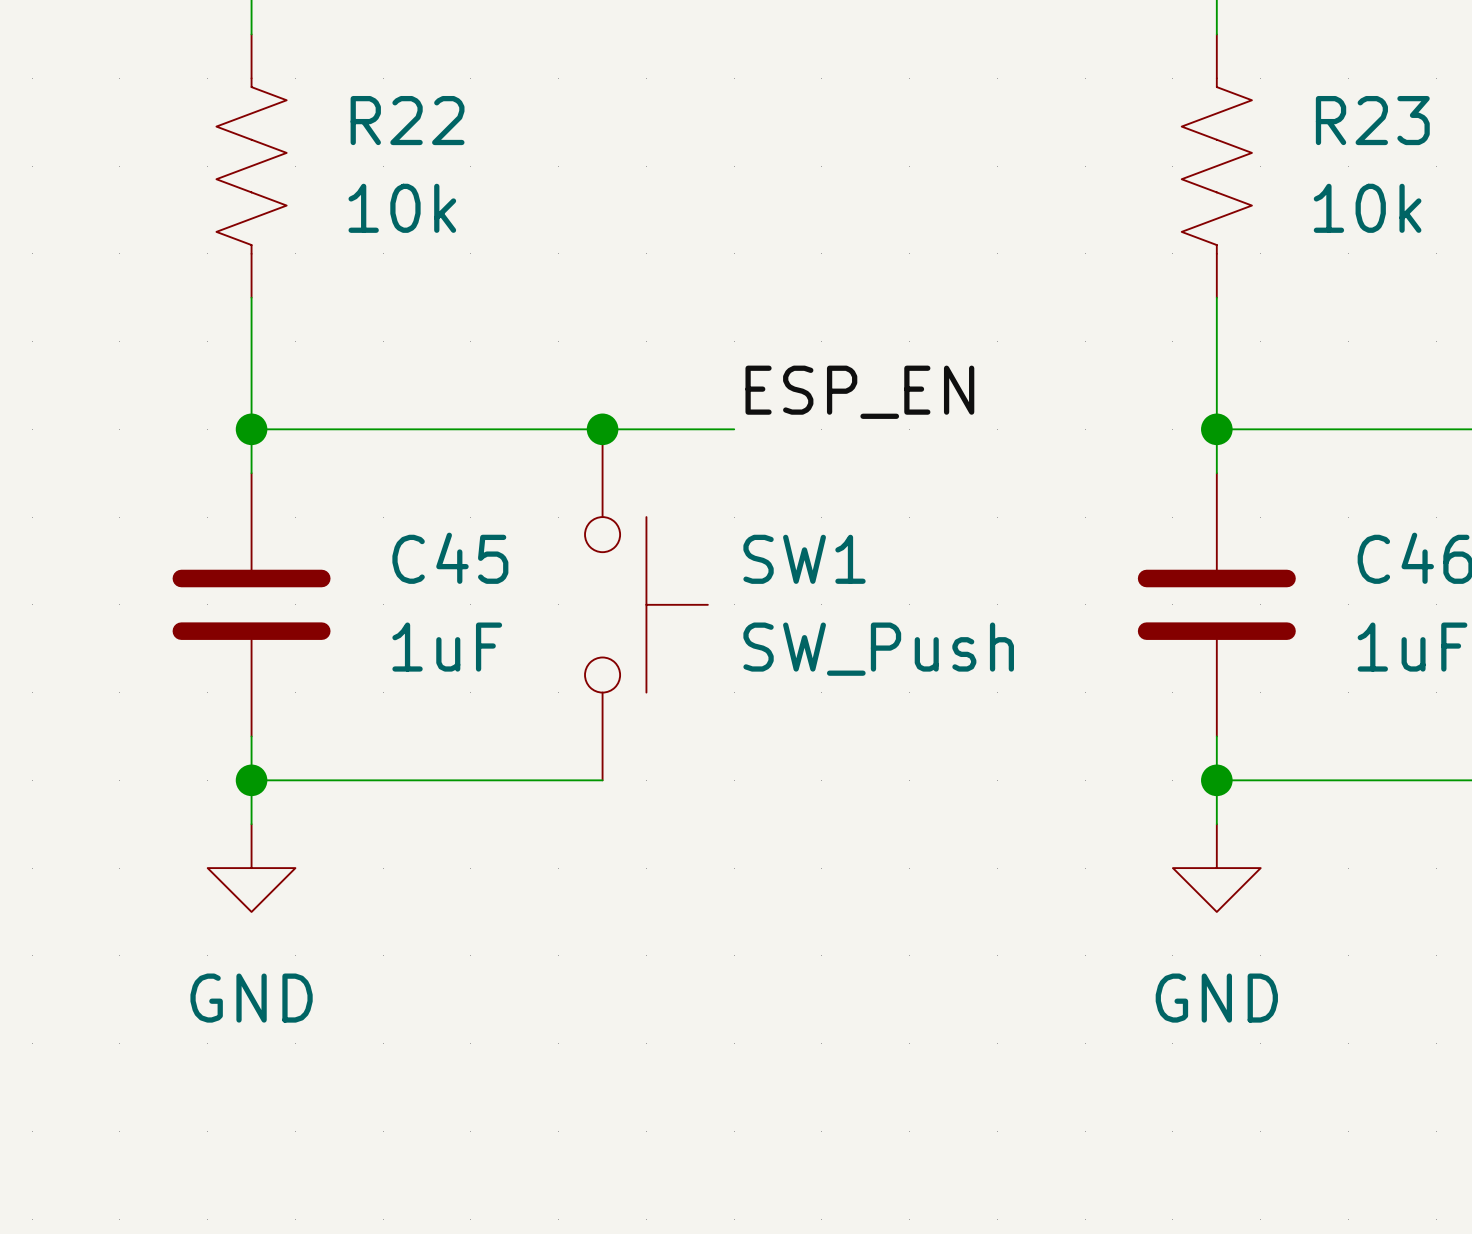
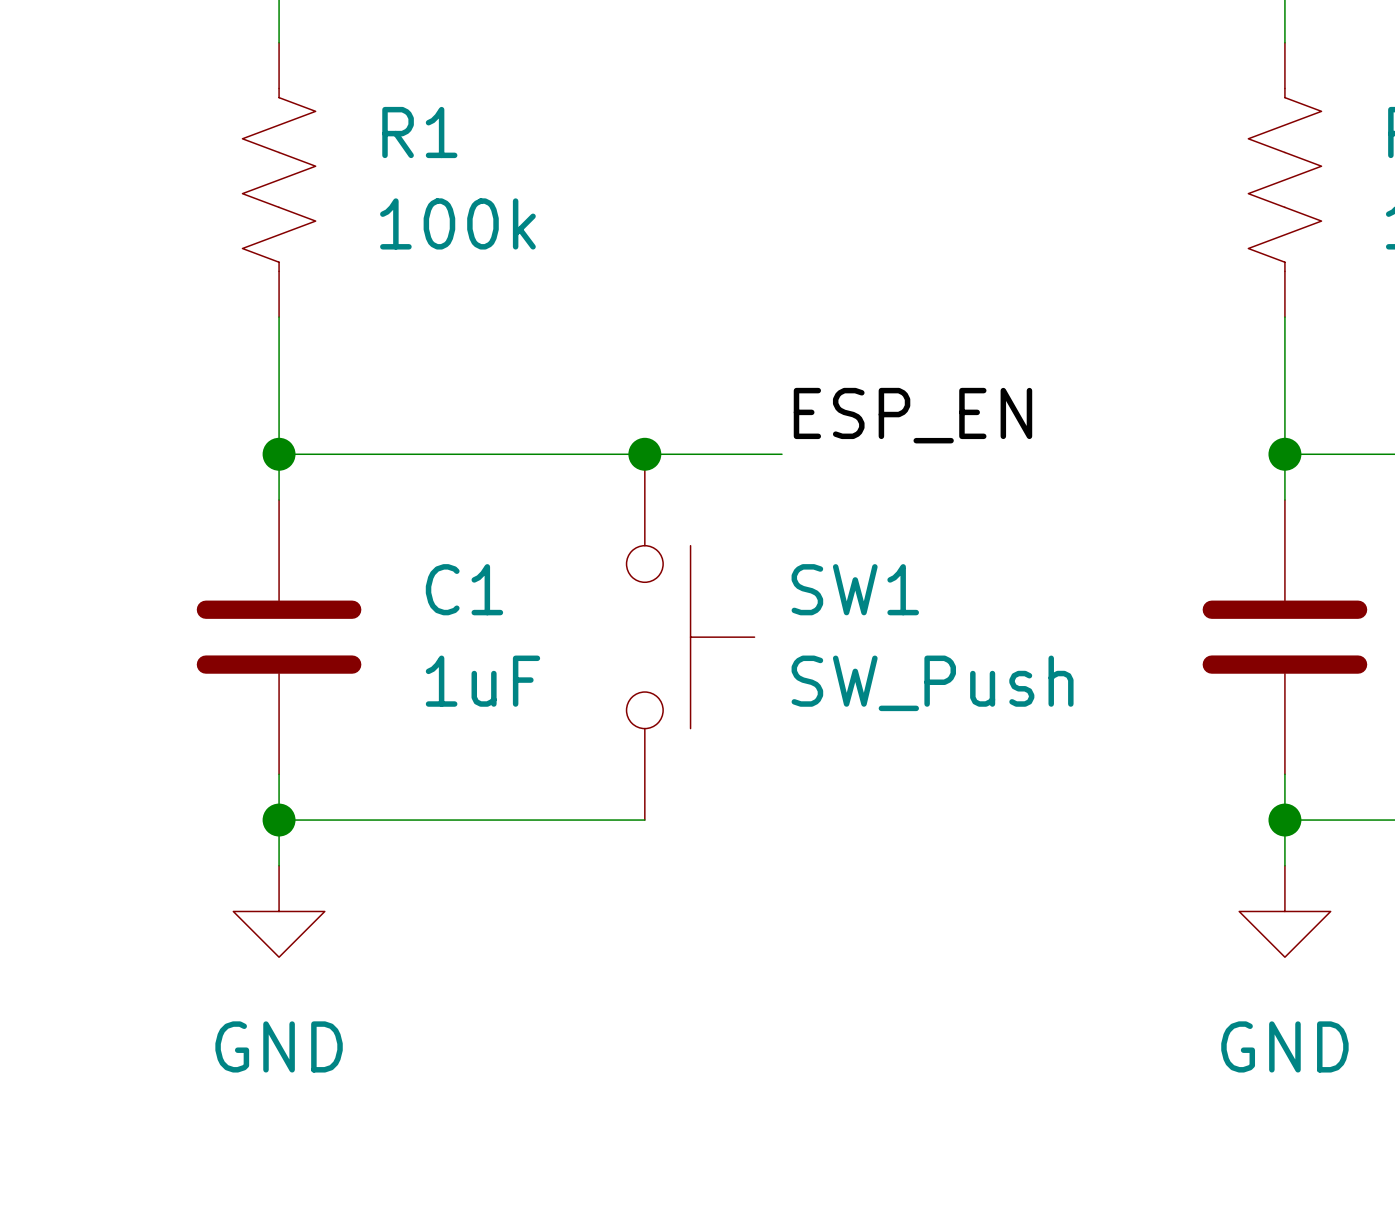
R22 name: R22 (407, 120) -> R1 (419, 132)
R22 value: 10k (402, 208) -> 100k (457, 223)
C45 name: C45 (450, 558) -> C1 (464, 589)

